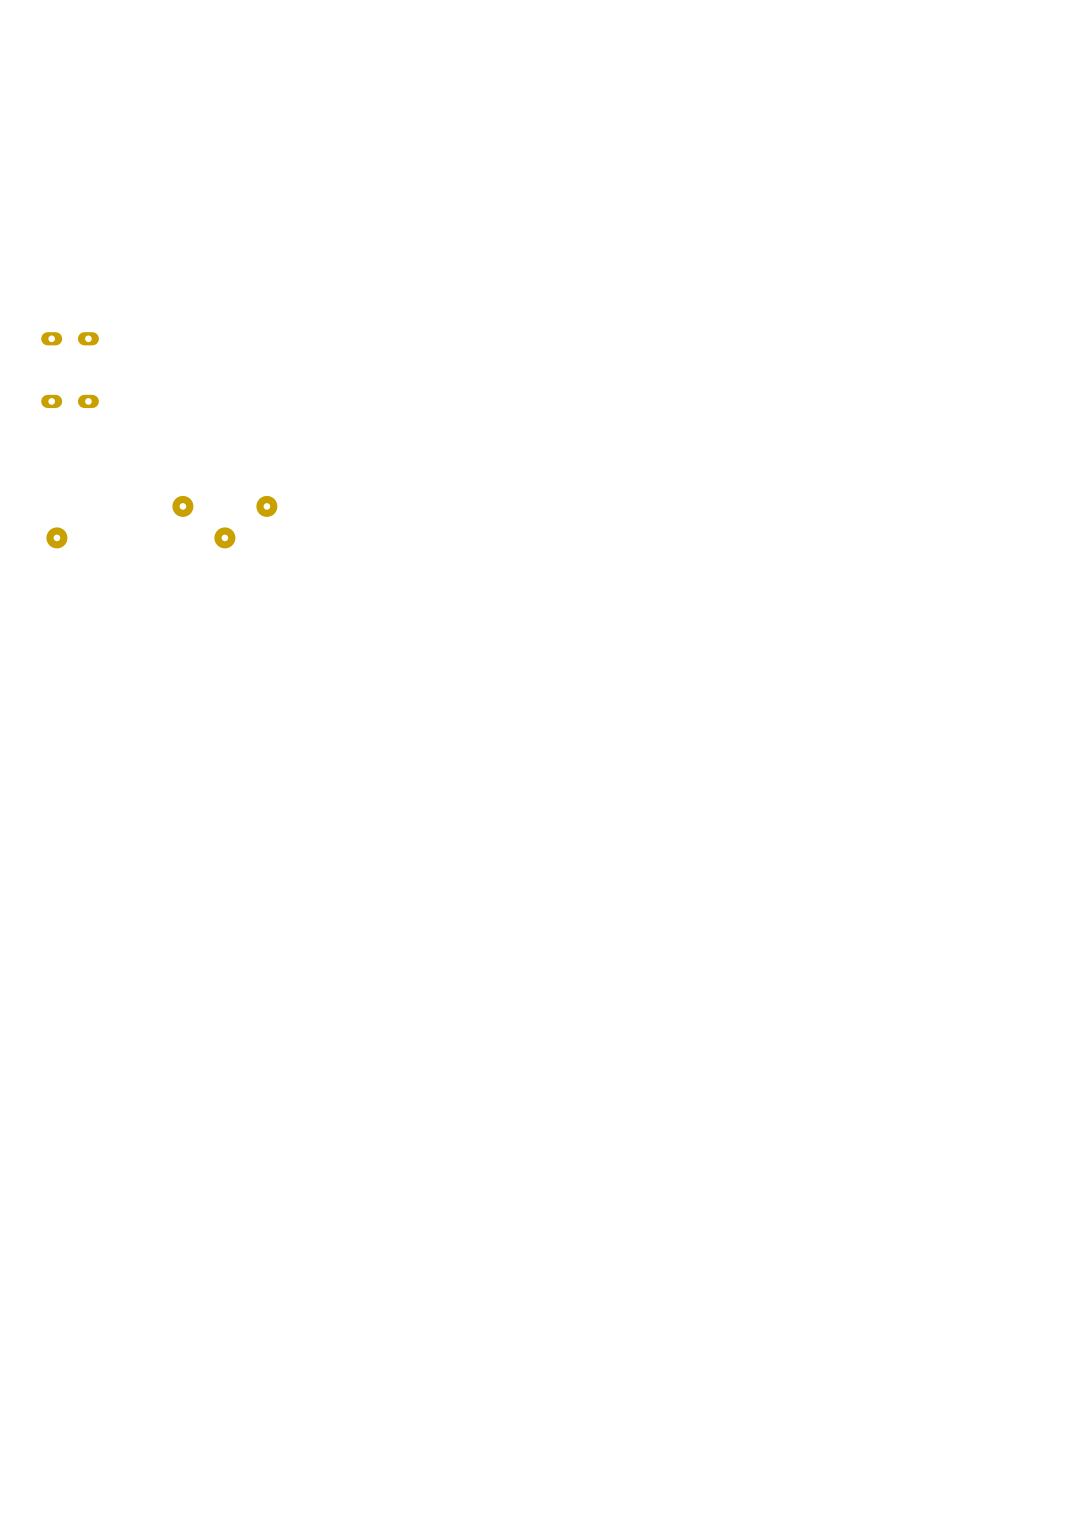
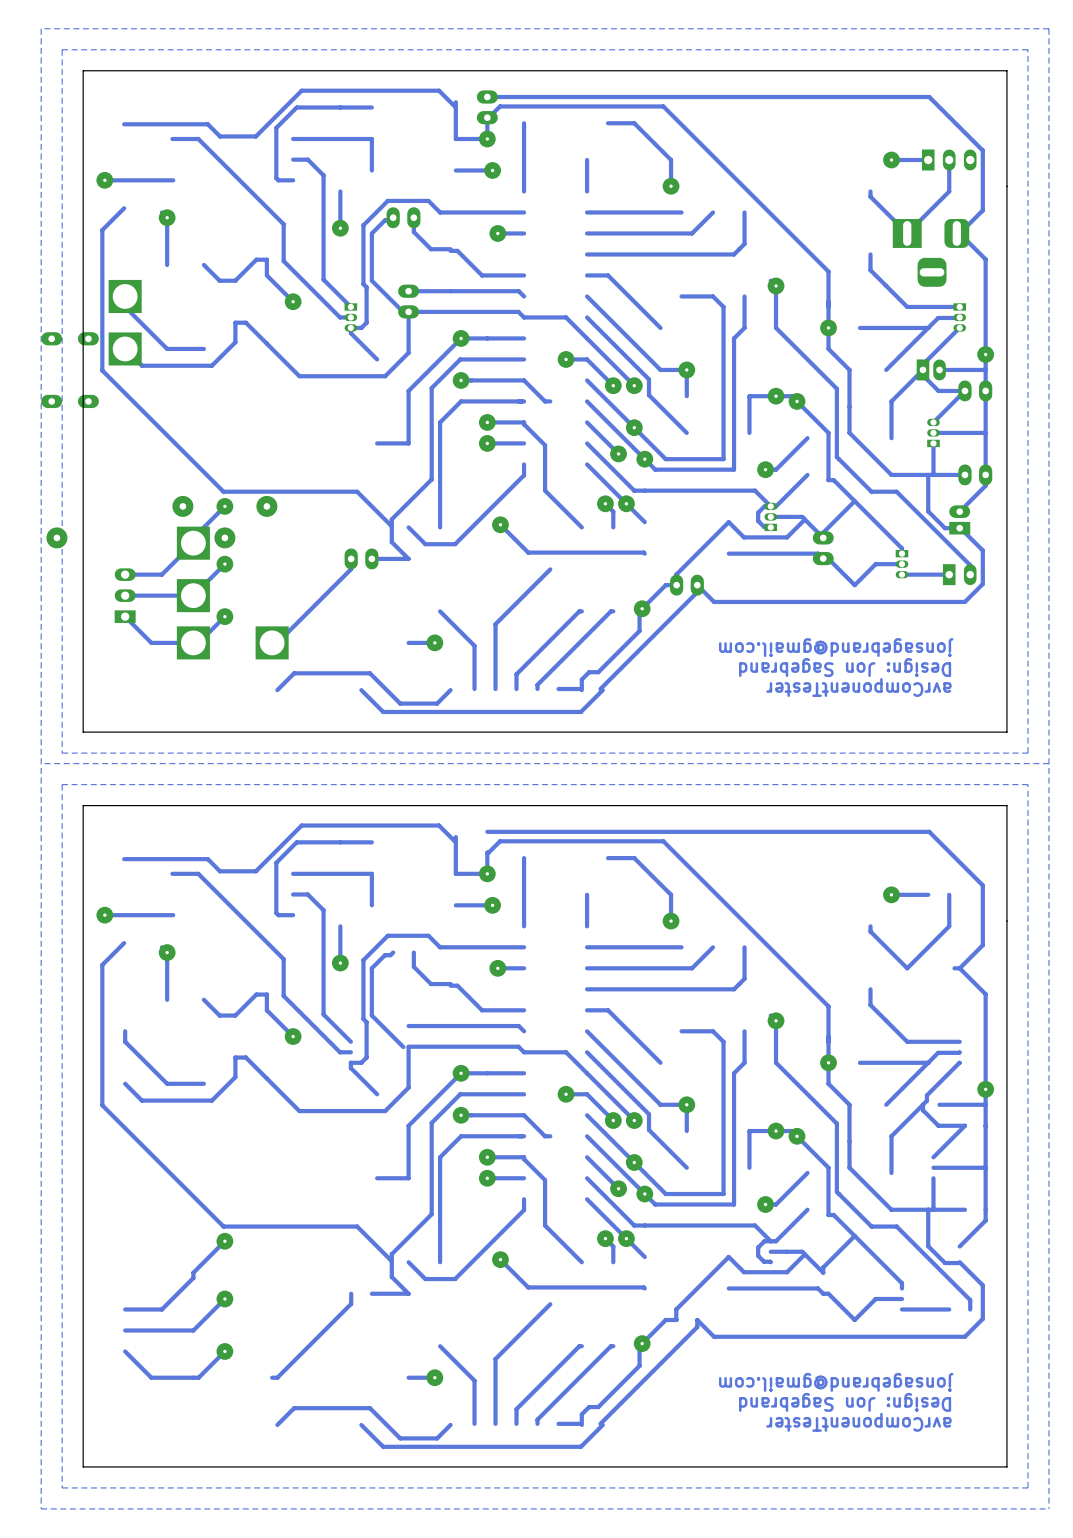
zone outline: none -> (1048, 28) (41, 28) (41, 1508) (1048, 1508) (1048, 28)
zone outline: none -> (1027, 49) (1027, 753) (62, 753) (62, 49) (1027, 49)
board edge: none -> (1006, 70) (1006, 732) (83, 732) (83, 70) (1006, 70)
track: none -> (487, 97) (929, 97) (982, 150) (982, 210) (959, 233)
track: none -> (455, 102) (455, 138) (487, 138) (487, 117)
track: none -> (371, 107) (296, 107) (276, 127) (276, 178) (278, 180) (293, 180)
track: none -> (455, 107) (439, 90) (301, 90) (255, 136) (220, 136) (207, 124) (124, 124)
part: none -> (487, 107)
track: none -> (487, 118) (500, 106) (663, 106) (828, 271) (828, 348) (849, 369) (849, 432) (891, 474) (964, 474)
track: none -> (524, 123) (524, 191)
track: none -> (608, 123) (634, 123) (671, 159) (671, 186)
track: none -> (172, 138) (198, 138) (283, 224) (283, 261) (340, 317) (350, 317)
track: none -> (293, 138) (371, 138) (371, 170)
via: none -> (487, 138)
track: none -> (293, 159) (307, 159) (323, 175) (323, 279) (350, 306)
track: none -> (587, 159) (587, 191)
via: none -> (891, 159)
track: none -> (928, 159) (886, 159)
track: none -> (949, 159) (949, 191) (907, 233) (870, 196) (870, 191)
part: none -> (949, 159)
track: none -> (492, 170) (455, 170)
via: none -> (492, 170)
via: none -> (104, 180)
track: none -> (173, 180) (98, 180)
via: none -> (671, 186)
track: none -> (340, 191) (340, 228)
track: none -> (124, 208) (102, 230) (102, 370) (223, 491) (357, 491) (391, 526)
track: none -> (161, 212) (167, 217) (167, 264)
track: none -> (524, 212) (440, 212) (428, 200) (387, 200) (363, 225) (363, 284) (366, 287) (366, 322) (361, 327) (350, 327) (350, 333) (377, 359)
track: none -> (681, 212) (587, 212)
track: none -> (713, 212) (692, 233) (587, 233)
track: none -> (744, 212) (744, 243) (734, 254) (587, 254)
via: none -> (167, 217)
track: none -> (393, 217) (390, 220) (384, 220) (371, 233) (371, 280) (403, 312)
part: none -> (403, 217)
track: none -> (413, 217) (413, 232) (431, 249) (450, 249)
via: none -> (340, 228)
via: none -> (497, 233)
track: none -> (524, 233) (497, 233)
track: none -> (959, 233) (985, 259) (985, 390)
track: none -> (450, 250) (457, 250) (482, 275) (524, 275)
part: none -> (931, 252)
track: none -> (870, 254) (870, 270) (907, 306) (959, 306)
track: none -> (203, 264) (219, 280) (235, 280) (256, 259) (266, 259) (266, 275) (293, 301)
track: none -> (587, 275) (608, 275) (660, 327)
track: none -> (770, 280) (776, 285) (776, 327) (836, 388) (836, 457) (871, 491) (896, 491) (970, 565) (970, 574)
via: none -> (776, 285)
track: none -> (408, 291) (518, 291) (524, 296)
track: none -> (125, 296) (125, 306) (167, 348) (203, 348)
part: none -> (125, 296)
track: none -> (587, 296) (660, 369) (686, 369) (686, 396)
track: none -> (681, 296) (713, 296) (723, 306) (723, 459) (665, 459) (587, 380)
track: none -> (744, 296) (744, 327) (734, 338) (734, 469) (655, 469) (587, 401)
via: none -> (293, 301)
part: none -> (408, 301)
track: none -> (408, 311) (518, 311) (524, 317) (566, 317) (634, 385)
track: none -> (408, 312) (408, 352) (385, 376) (299, 376) (245, 322) (235, 322) (235, 342) (211, 365) (141, 365) (125, 348)
part: none -> (350, 317)
track: none -> (587, 317) (649, 379) (649, 395) (686, 432)
track: none -> (959, 317) (938, 317) (886, 369)
part: none -> (959, 317)
via: none -> (828, 327)
track: none -> (928, 327) (860, 327)
track: none -> (959, 327) (926, 360) (926, 366) (891, 401) (891, 438)
via: none -> (461, 338)
track: none -> (524, 338) (461, 338) (408, 390) (408, 443) (377, 443)
part: none -> (125, 348)
via: none -> (985, 354)
track: none -> (524, 359) (460, 359) (431, 388) (431, 479) (391, 519) (391, 542) (408, 558) (371, 558)
track: none -> (566, 359) (587, 359) (613, 385)
via: none -> (566, 359)
via: none -> (686, 369)
track: none -> (922, 369) (922, 375) (938, 390) (964, 390) (933, 422)
part: none -> (931, 369)
track: none -> (985, 369) (939, 369)
track: none -> (461, 380) (524, 380) (545, 401) (550, 401)
via: none -> (461, 380)
via: none -> (613, 385)
via: none -> (634, 385)
part: none -> (975, 390)
track: none -> (985, 390) (985, 485) (959, 511)
via: none -> (776, 396)
track: none -> (524, 401) (461, 401) (440, 422) (440, 527)
via: none -> (797, 401)
track: none -> (487, 422) (524, 422) (545, 445) (545, 490) (581, 527)
via: none -> (487, 422)
track: none -> (587, 422) (618, 453) (618, 459)
via: none -> (634, 427)
track: none -> (749, 432) (749, 396) (791, 396) (828, 432) (828, 480) (833, 480) (901, 548) (901, 553)
track: none -> (933, 432) (985, 433)
part: none -> (933, 432)
track: none -> (807, 438) (776, 469) (765, 469)
via: none -> (487, 443)
track: none -> (524, 443) (487, 443)
track: none -> (587, 443) (634, 490) (755, 490) (770, 506)
track: none -> (933, 443) (933, 474)
via: none -> (618, 453)
via: none -> (644, 459)
track: none -> (524, 464) (524, 475) (455, 544) (425, 544) (408, 527)
track: none -> (587, 464) (644, 522)
via: none -> (765, 469)
track: none -> (807, 474) (776, 506) (764, 506) (758, 512) (758, 521) (764, 526) (770, 527)
track: none -> (928, 474) (928, 511) (945, 528) (959, 528)
part: none -> (975, 474)
track: none -> (602, 501) (613, 511) (613, 527)
track: none -> (854, 501) (823, 532) (823, 537) (802, 516) (770, 516)
via: none -> (605, 503)
via: none -> (626, 503)
track: none -> (224, 506) (193, 537) (193, 543) (161, 574) (125, 574)
via: none -> (224, 506)
part: none -> (770, 516)
track: none -> (804, 519) (787, 537) (744, 537) (728, 522) (676, 574) (676, 585)
part: none -> (959, 519)
track: none -> (497, 522) (528, 552) (644, 553)
via: none -> (500, 524)
track: none -> (959, 527) (982, 550) (982, 584) (964, 601) (714, 601) (697, 585) (697, 592) (600, 689)
part: none -> (193, 543)
part: none -> (823, 548)
track: none -> (728, 553) (818, 553) (823, 558) (828, 558) (854, 585) (875, 564) (901, 564)
track: none -> (351, 558) (351, 569) (277, 642) (272, 642)
part: none -> (361, 558)
track: none -> (224, 564) (193, 595) (125, 595)
via: none -> (224, 564)
part: none -> (901, 564)
track: none -> (550, 569) (495, 624) (495, 689)
track: none -> (949, 574) (901, 574)
part: none -> (959, 574)
track: none -> (676, 585) (665, 585) (639, 611) (639, 631) (598, 672) (589, 672) (581, 679) (581, 690)
part: none -> (686, 585)
part: none -> (125, 595)
part: none -> (193, 595)
via: none -> (642, 608)
track: none -> (440, 611) (474, 645) (474, 689)
track: none -> (581, 611) (579, 611) (516, 674) (516, 689)
track: none -> (613, 611) (610, 611) (537, 684) (537, 689)
track: none -> (224, 616) (198, 642) (151, 642) (125, 616)
via: none -> (224, 616)
part: none -> (193, 642)
part: none -> (272, 642)
track: none -> (434, 642) (408, 642)
via: none -> (434, 642)
text: none -> jonsagebrand@gmail.com (836, 647)
text: none -> Design: Jon Sagebrand (845, 667)
text: none -> avrComponentTester (858, 687)
track: none -> (580, 689) (558, 689)
track: none -> (450, 690) (437, 703) (400, 703) (370, 673) (294, 673) (277, 690)
track: none -> (602, 690) (580, 711) (383, 711) (361, 690)
zone outline: none -> (1048, 763) (41, 763)
zone outline: none -> (1027, 784) (1027, 1487) (62, 1487) (62, 784) (1027, 784)
board edge: none -> (1006, 805) (1006, 1466) (83, 1466) (83, 805) (1006, 805)
track: none -> (487, 831) (929, 831) (982, 885) (982, 945) (959, 968)
track: none -> (455, 837) (455, 873) (487, 873) (487, 852)
track: none -> (371, 842) (296, 842) (276, 862) (276, 913) (278, 915) (293, 915)
track: none -> (455, 842) (439, 825) (301, 825) (255, 871) (220, 871) (207, 859) (124, 859)
track: none -> (487, 852) (500, 841) (663, 841) (828, 1006) (828, 1083) (849, 1104) (849, 1167) (891, 1209) (964, 1209)
track: none -> (524, 858) (524, 926)
track: none -> (608, 858) (634, 858) (671, 894) (671, 921)
track: none -> (172, 873) (198, 873) (283, 959) (283, 995) (340, 1052) (350, 1052)
track: none -> (293, 873) (371, 873) (371, 905)
via: none -> (487, 873)
track: none -> (293, 894) (307, 894) (323, 910) (323, 1014) (350, 1041)
track: none -> (587, 894) (587, 926)
via: none -> (891, 894)
track: none -> (928, 894) (886, 894)
track: none -> (949, 894) (949, 926) (907, 968) (870, 931) (870, 926)
track: none -> (492, 905) (455, 905)
via: none -> (492, 905)
via: none -> (104, 915)
track: none -> (173, 915) (98, 915)
via: none -> (671, 921)
track: none -> (340, 926) (340, 963)
track: none -> (124, 943) (102, 964) (102, 1105) (223, 1226) (357, 1226) (391, 1261)
track: none -> (161, 947) (167, 952) (167, 999)
track: none -> (524, 947) (440, 947) (428, 935) (387, 935) (363, 960) (363, 1019) (366, 1022) (366, 1057) (361, 1062) (350, 1062) (350, 1068) (377, 1094)
track: none -> (681, 947) (587, 947)
track: none -> (713, 947) (692, 968) (587, 968)
track: none -> (744, 947) (744, 978) (734, 989) (587, 989)
via: none -> (167, 952)
track: none -> (393, 952) (390, 955) (384, 955) (371, 968) (371, 1015) (403, 1047)
track: none -> (413, 952) (413, 966) (431, 984) (450, 984)
via: none -> (340, 963)
via: none -> (497, 968)
track: none -> (524, 968) (497, 968)
track: none -> (959, 968) (954, 968)
track: none -> (959, 968) (985, 994) (985, 1125)
track: none -> (450, 985) (457, 985) (482, 1010) (524, 1010)
track: none -> (870, 989) (870, 1005) (907, 1041) (959, 1041)
track: none -> (203, 999) (219, 1015) (235, 1015) (256, 994) (266, 994) (266, 1010) (293, 1036)
track: none -> (587, 1010) (608, 1010) (660, 1062)
track: none -> (770, 1015) (776, 1020) (776, 1062) (836, 1123) (836, 1191) (871, 1226) (896, 1226) (970, 1300) (970, 1309)
via: none -> (776, 1020)
track: none -> (408, 1026) (518, 1026) (524, 1031)
track: none -> (125, 1031) (125, 1041) (167, 1083) (203, 1083)
track: none -> (587, 1031) (660, 1104) (686, 1104) (686, 1131)
track: none -> (681, 1031) (713, 1031) (723, 1041) (723, 1194) (665, 1194) (587, 1115)
track: none -> (744, 1031) (744, 1062) (734, 1073) (734, 1204) (655, 1204) (587, 1136)
via: none -> (293, 1036)
track: none -> (408, 1046) (518, 1046) (524, 1052) (566, 1052) (634, 1120)
track: none -> (408, 1047) (408, 1087) (385, 1111) (299, 1111) (245, 1057) (235, 1057) (235, 1077) (211, 1100) (141, 1100) (125, 1083)
track: none -> (587, 1052) (649, 1114) (649, 1129) (686, 1167)
track: none -> (959, 1052) (938, 1052) (886, 1104)
via: none -> (828, 1062)
track: none -> (928, 1062) (860, 1062)
track: none -> (959, 1062) (926, 1095) (926, 1100) (891, 1136) (891, 1173)
via: none -> (461, 1073)
track: none -> (524, 1073) (461, 1073) (408, 1125) (408, 1178) (377, 1178)
via: none -> (985, 1089)
track: none -> (524, 1094) (460, 1094) (431, 1122) (431, 1214) (391, 1254) (391, 1276) (408, 1293) (371, 1293)
track: none -> (566, 1094) (587, 1094) (613, 1120)
via: none -> (566, 1094)
via: none -> (686, 1104)
track: none -> (922, 1104) (922, 1110) (938, 1125) (964, 1125) (933, 1157)
track: none -> (985, 1104) (939, 1104)
track: none -> (461, 1115) (524, 1115) (545, 1136) (550, 1136)
via: none -> (461, 1115)
via: none -> (613, 1120)
via: none -> (634, 1120)
track: none -> (985, 1125) (985, 1220) (959, 1246)
via: none -> (776, 1131)
track: none -> (524, 1136) (461, 1136) (440, 1157) (440, 1262)
via: none -> (797, 1136)
track: none -> (487, 1157) (524, 1157) (545, 1180) (545, 1225) (581, 1262)
via: none -> (487, 1157)
track: none -> (587, 1157) (618, 1188) (618, 1194)
via: none -> (634, 1162)
track: none -> (749, 1167) (749, 1131) (791, 1131) (828, 1167) (828, 1215) (833, 1215) (901, 1283) (901, 1288)
track: none -> (933, 1167) (985, 1168)
track: none -> (807, 1173) (776, 1204) (765, 1204)
via: none -> (487, 1178)
track: none -> (524, 1178) (487, 1178)
track: none -> (587, 1178) (634, 1225) (755, 1225) (770, 1241)
track: none -> (933, 1178) (933, 1209)
via: none -> (618, 1188)
via: none -> (644, 1194)
track: none -> (524, 1199) (524, 1210) (455, 1279) (425, 1279) (408, 1262)
track: none -> (587, 1199) (644, 1257)
via: none -> (765, 1204)
track: none -> (807, 1209) (776, 1241) (764, 1241) (758, 1247) (758, 1255) (764, 1261) (770, 1262)
track: none -> (928, 1209) (928, 1246) (945, 1263) (959, 1263)
track: none -> (602, 1236) (613, 1246) (613, 1262)
track: none -> (854, 1236) (823, 1267) (823, 1272) (802, 1251) (770, 1251)
via: none -> (605, 1238)
via: none -> (626, 1238)
track: none -> (224, 1241) (193, 1272) (193, 1278) (161, 1309) (125, 1309)
via: none -> (224, 1241)
track: none -> (804, 1254) (787, 1272) (744, 1272) (728, 1257) (676, 1309) (676, 1319)
track: none -> (497, 1257) (528, 1287) (644, 1288)
via: none -> (500, 1259)
track: none -> (959, 1262) (982, 1285) (982, 1318) (964, 1336) (714, 1336) (697, 1319) (697, 1327) (600, 1423)
track: none -> (728, 1288) (818, 1288) (823, 1293) (828, 1293) (854, 1319) (875, 1298) (901, 1298)
track: none -> (351, 1293) (351, 1303) (277, 1377) (272, 1377)
track: none -> (224, 1298) (193, 1330) (125, 1330)
via: none -> (224, 1298)
track: none -> (550, 1304) (495, 1359) (495, 1423)
track: none -> (949, 1309) (901, 1309)
track: none -> (676, 1319) (665, 1319) (639, 1346) (639, 1365) (598, 1407) (589, 1407) (581, 1414) (581, 1424)
via: none -> (642, 1343)
track: none -> (440, 1346) (474, 1380) (474, 1423)
track: none -> (581, 1346) (579, 1346) (516, 1409) (516, 1423)
track: none -> (613, 1346) (610, 1346) (537, 1419) (537, 1423)
track: none -> (224, 1351) (198, 1377) (151, 1377) (125, 1351)
via: none -> (224, 1351)
track: none -> (434, 1377) (408, 1377)
via: none -> (434, 1377)
text: none -> jonsagebrand@gmail.com (836, 1382)
text: none -> Design: Jon Sagebrand (845, 1402)
text: none -> avrComponentTester (858, 1422)
track: none -> (580, 1423) (558, 1423)
track: none -> (450, 1424) (437, 1438) (400, 1438) (370, 1408) (294, 1408) (277, 1424)
track: none -> (602, 1424) (580, 1446) (383, 1446) (361, 1424)

